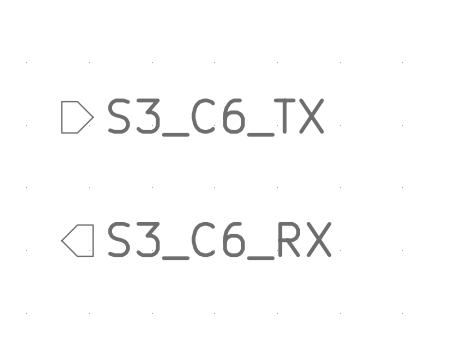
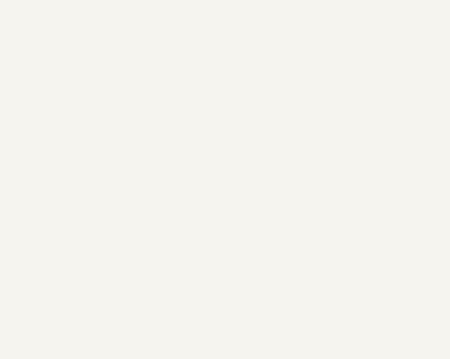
hierarchical label: S3_C6_TX (216, 117) -> none
hierarchical label: S3_C6_RX (219, 241) -> none

